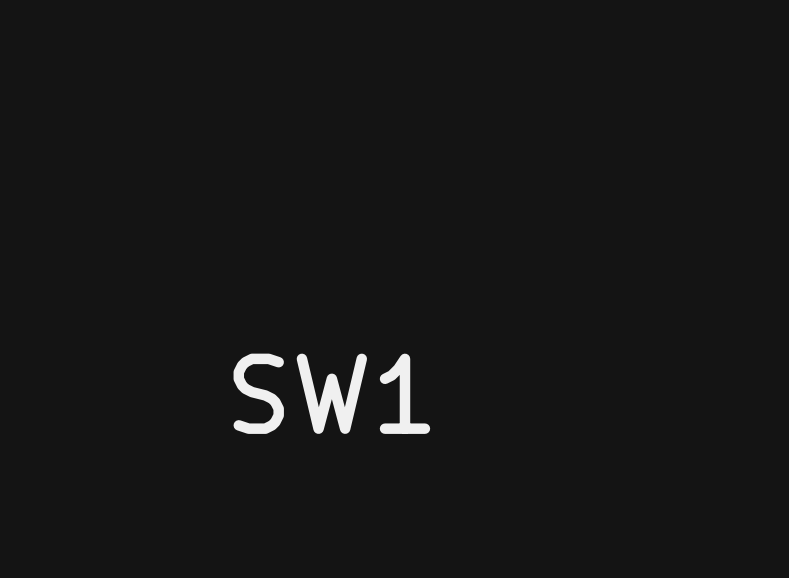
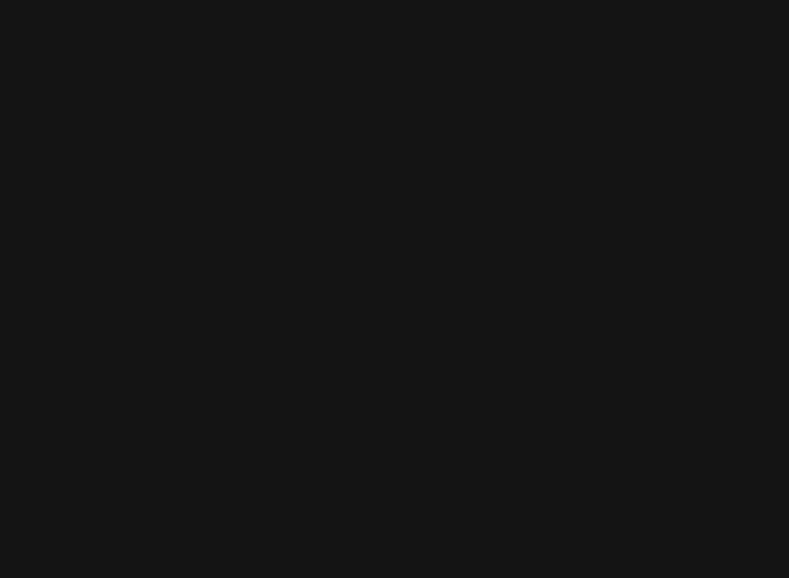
SW1: (331, 393) -> none

